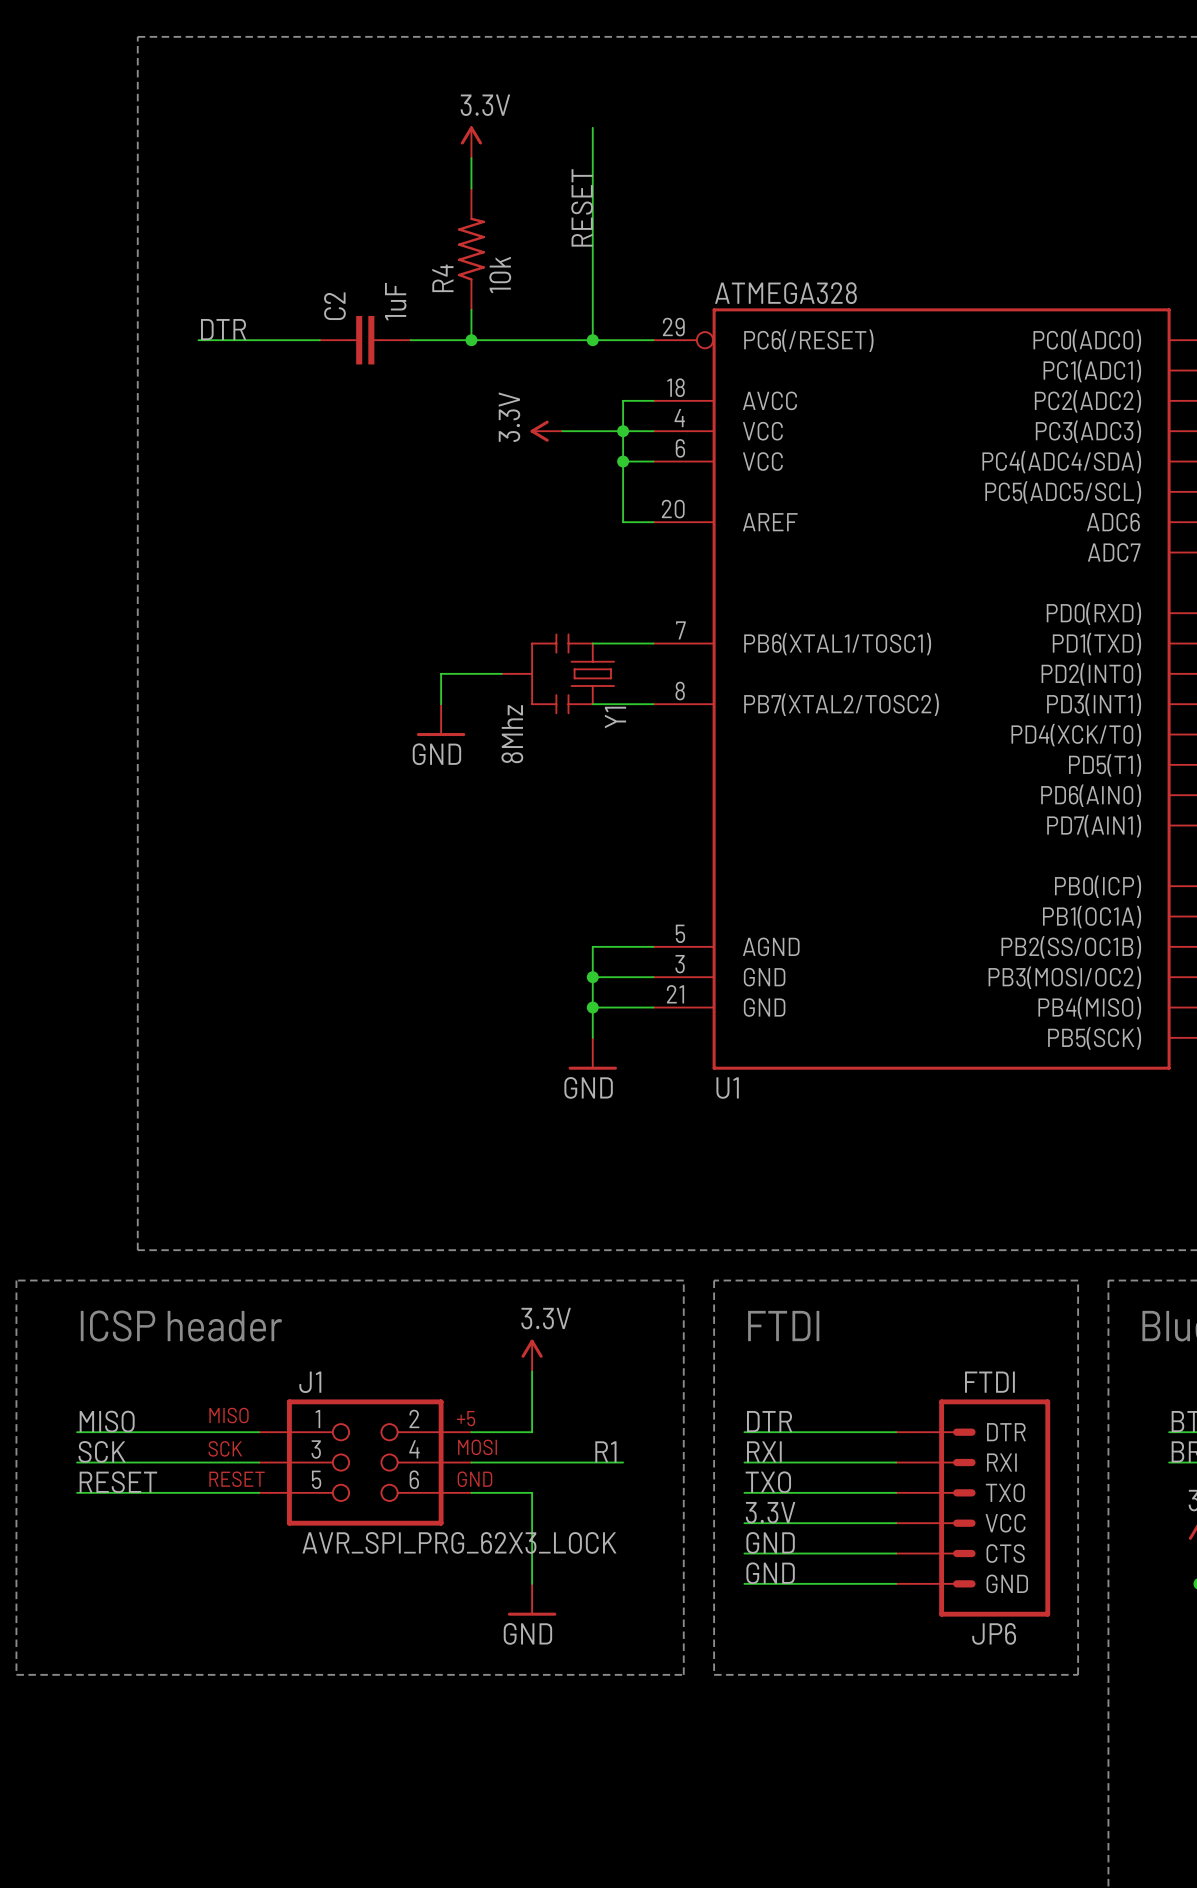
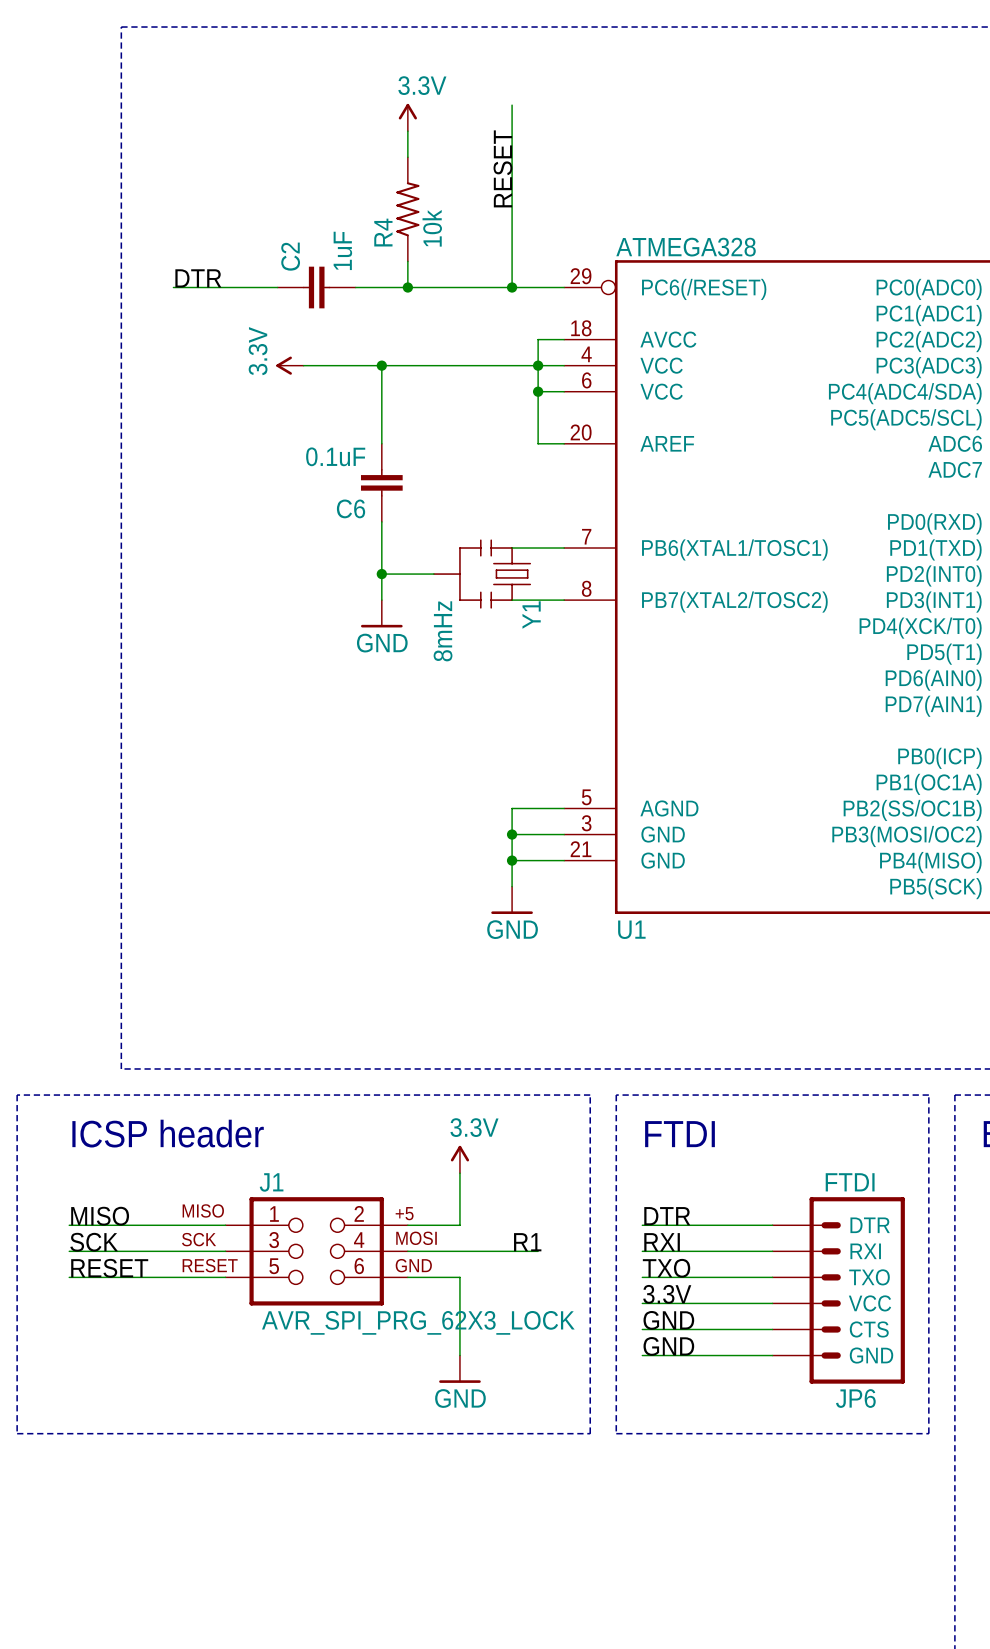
wire: none -> (303, 365) (486, 365)
wire: none -> (381, 365) (381, 443)
junction: none -> (381, 365)
power symbol position: 3.3V (546, 431) -> 3.3V (289, 365)
C6: none -> 0.1uF (381, 482)
wire: none -> (381, 521) (381, 574)
junction: none -> (381, 574)
Y1 value: 8Mhz (512, 734) -> 8mHz (443, 631)

